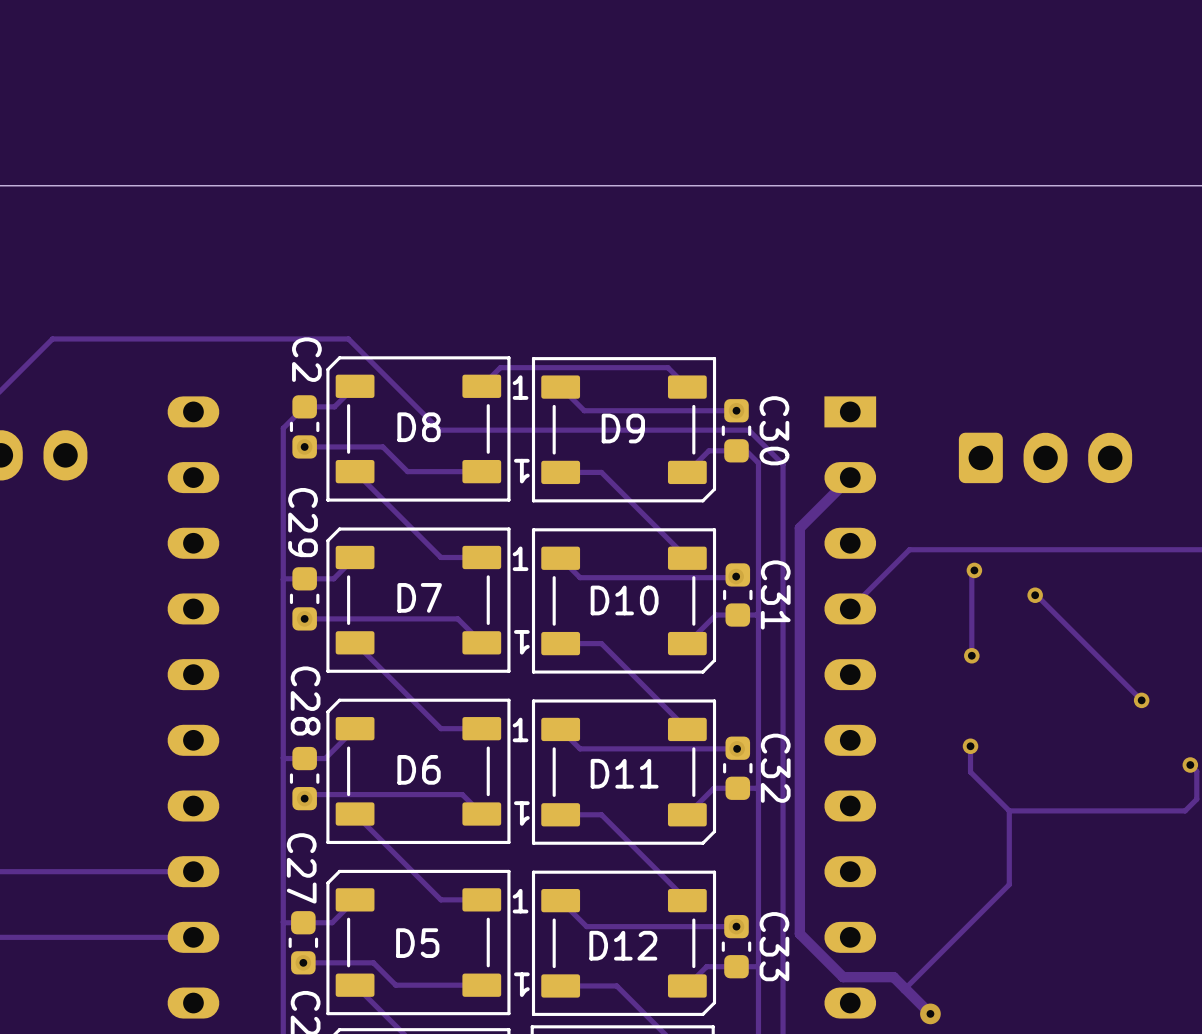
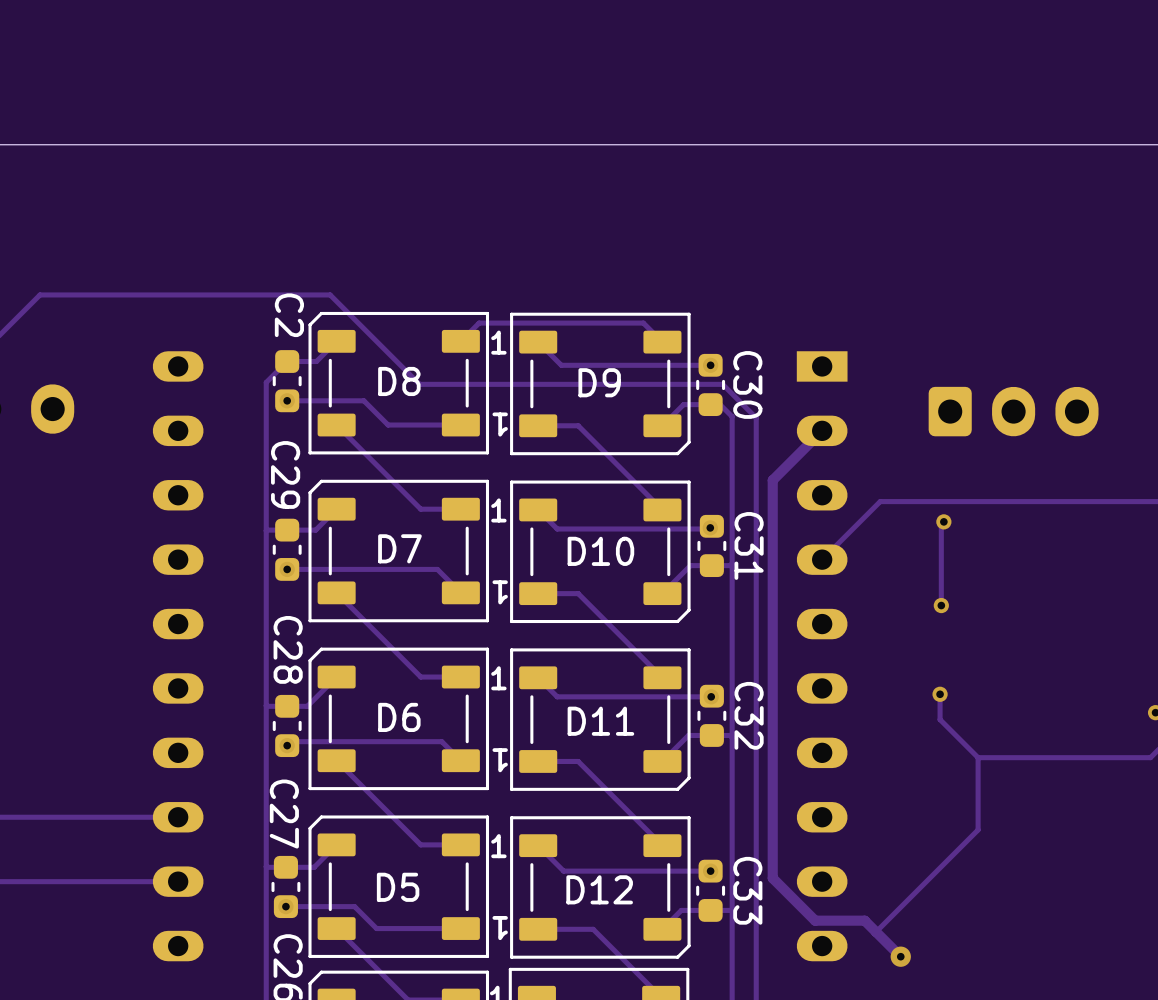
track: (1035, 595) (1141, 700) -> none
via: (1035, 595) -> none
via: (1141, 700) -> none

